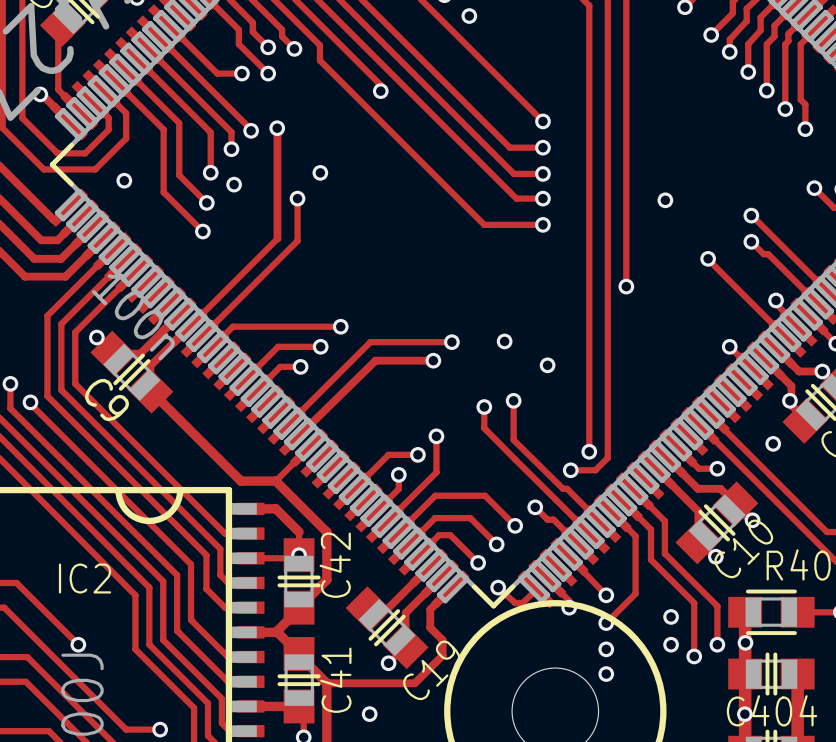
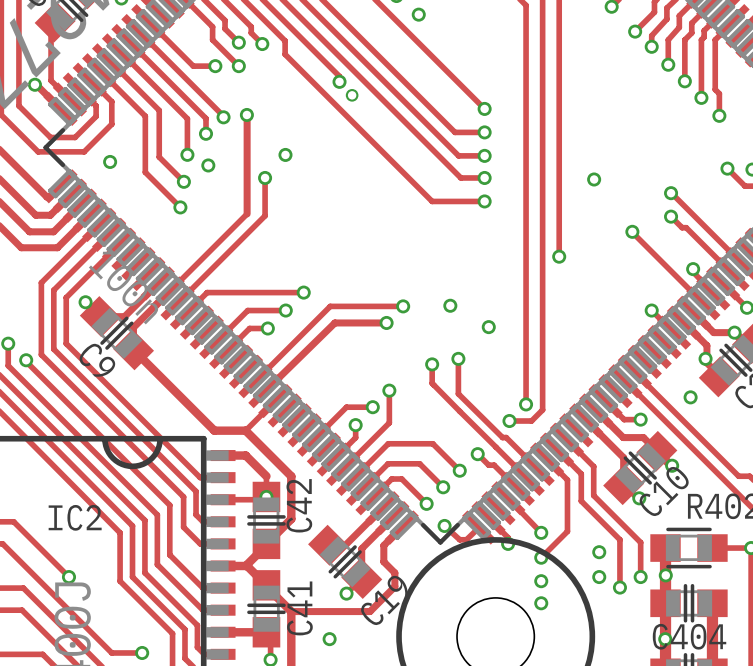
via: none -> (352, 95)

